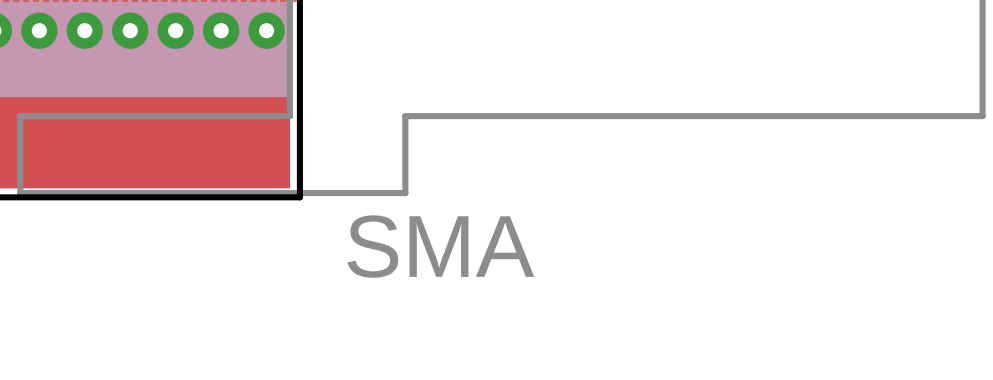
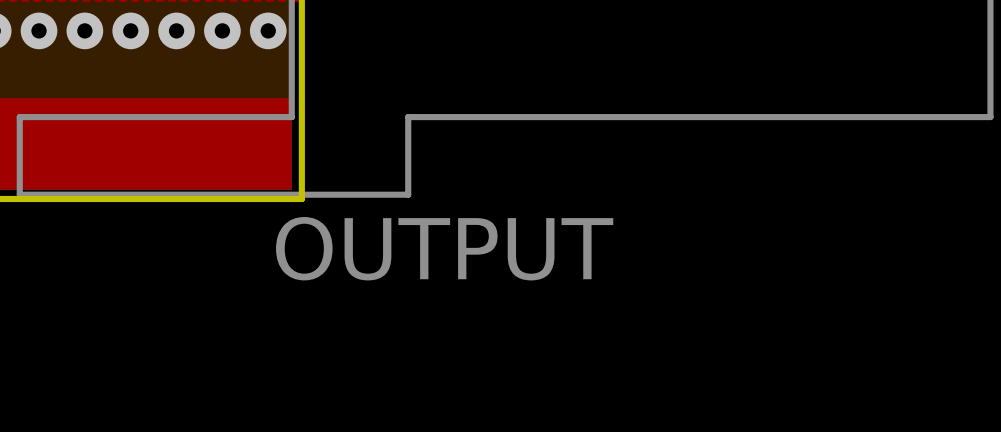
part value: SMA (440, 246) -> OUTPUT (444, 248)

